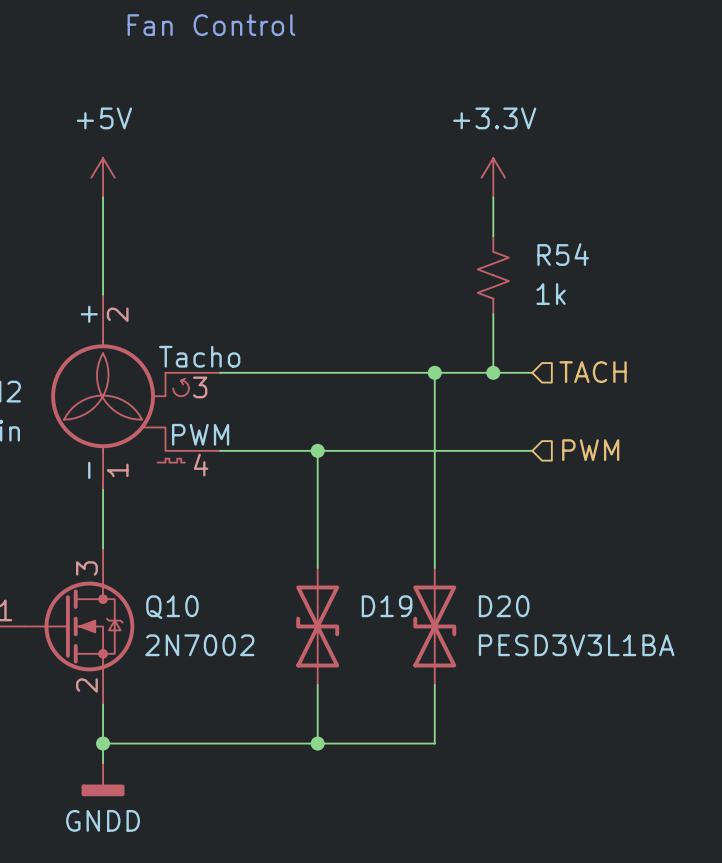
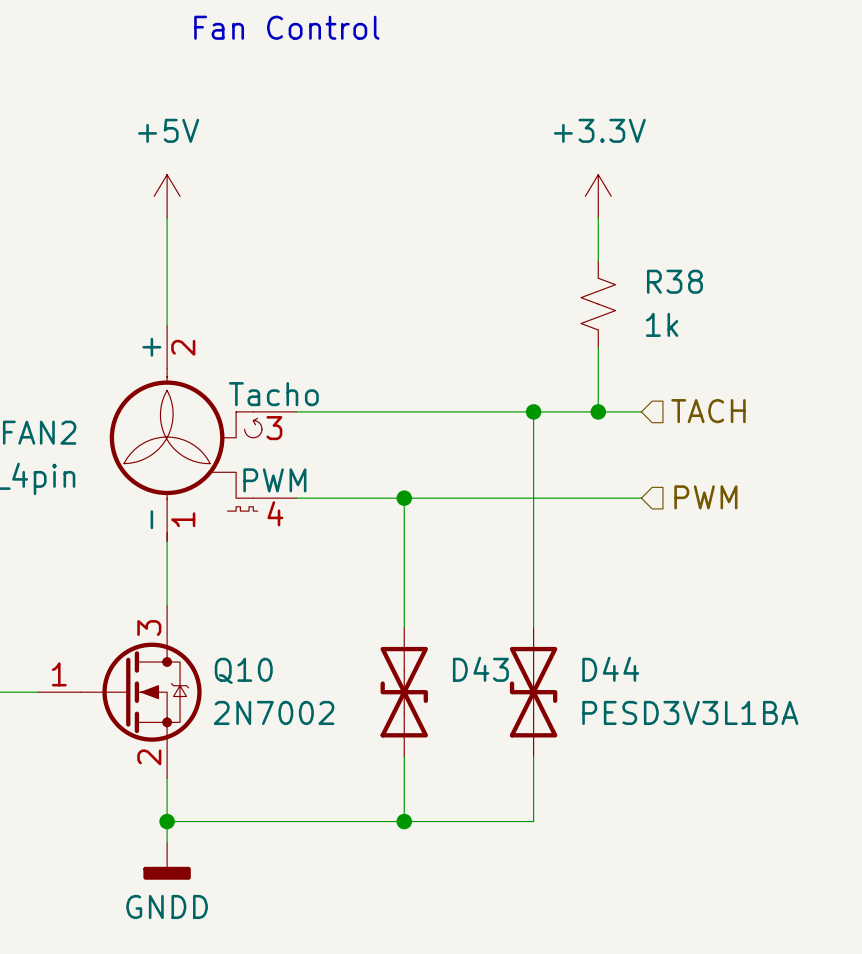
R54 name: R54 (563, 254) -> R38 (674, 281)
D19 name: D19 (387, 606) -> D43 (480, 669)
D20 name: D20 (504, 606) -> D44 (610, 669)

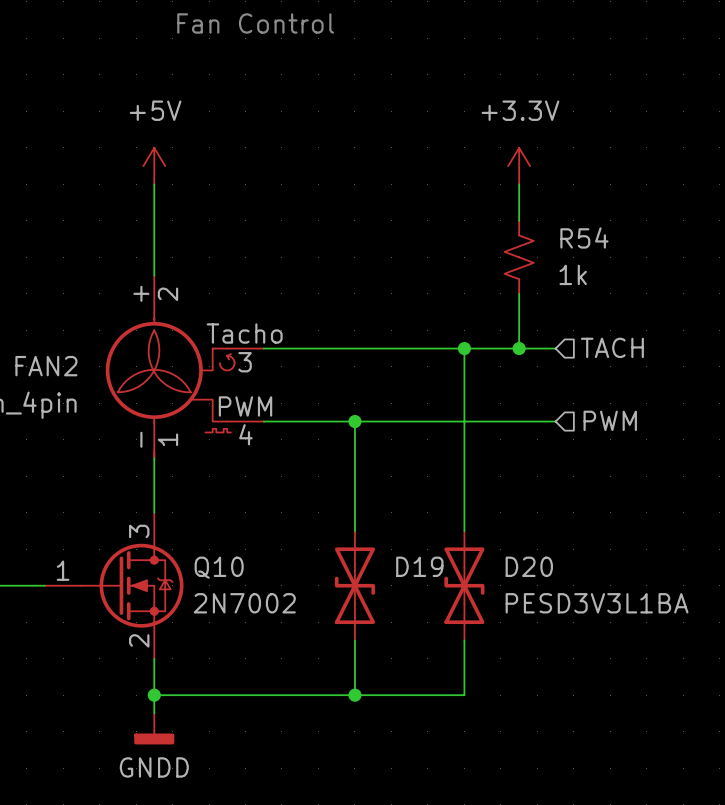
R38 name: R38 (674, 281) -> R54 (584, 237)
D43 name: D43 (480, 669) -> D19 (419, 566)
D44 name: D44 (610, 669) -> D20 (529, 566)

